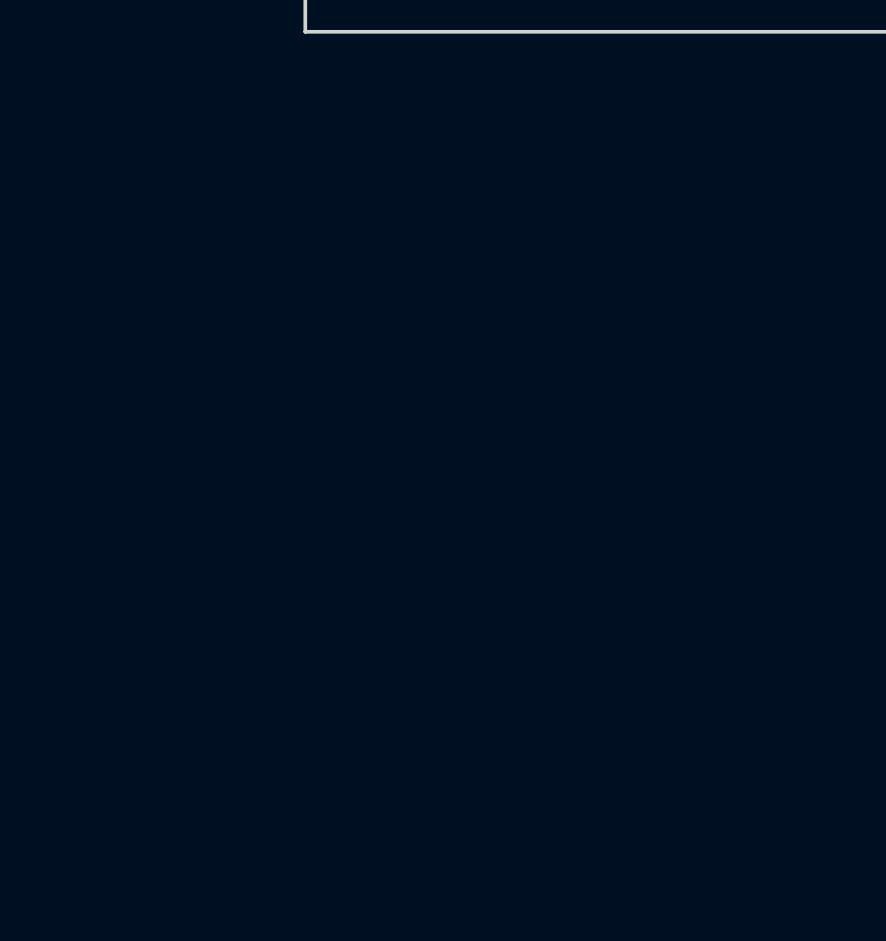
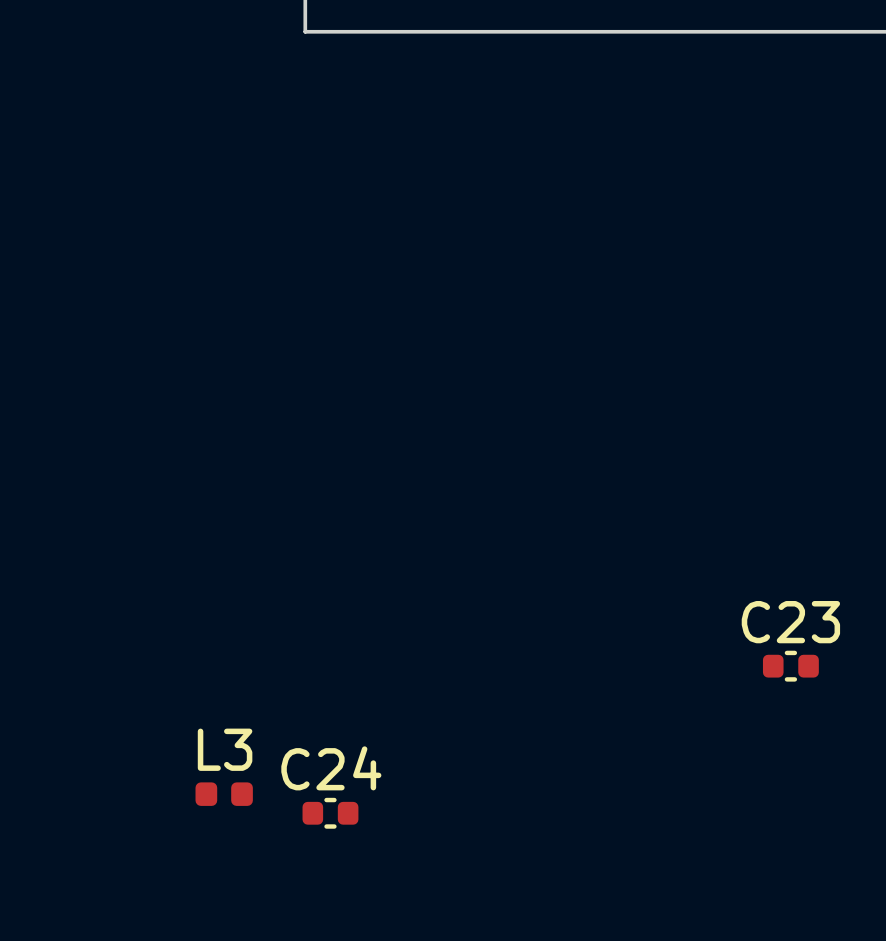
C23: none -> (790, 666)
L3: none -> (224, 794)
C24: none -> (330, 813)

